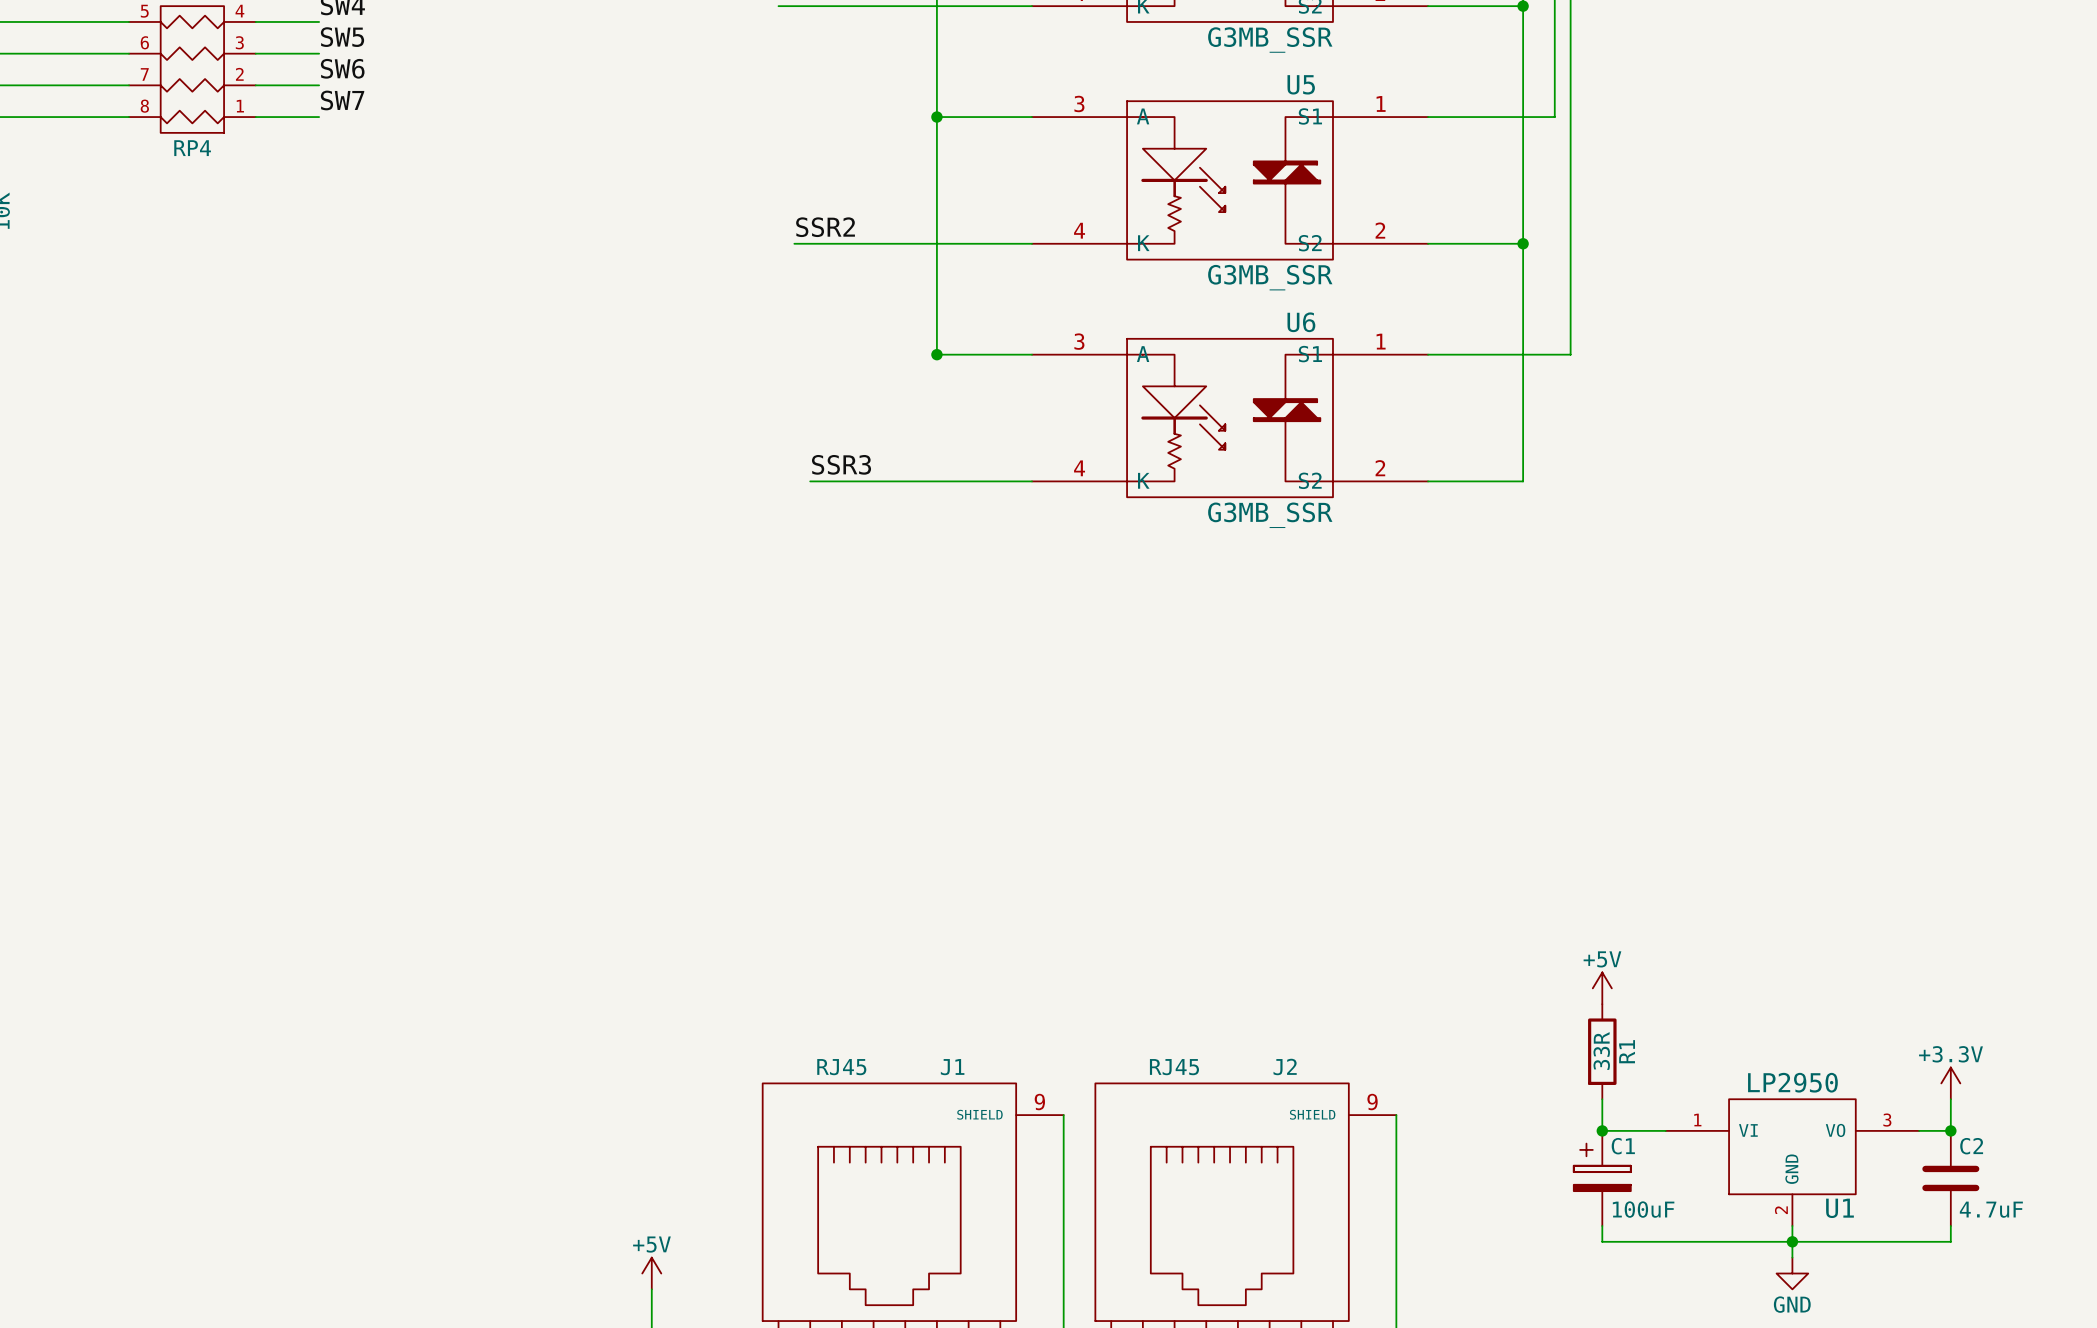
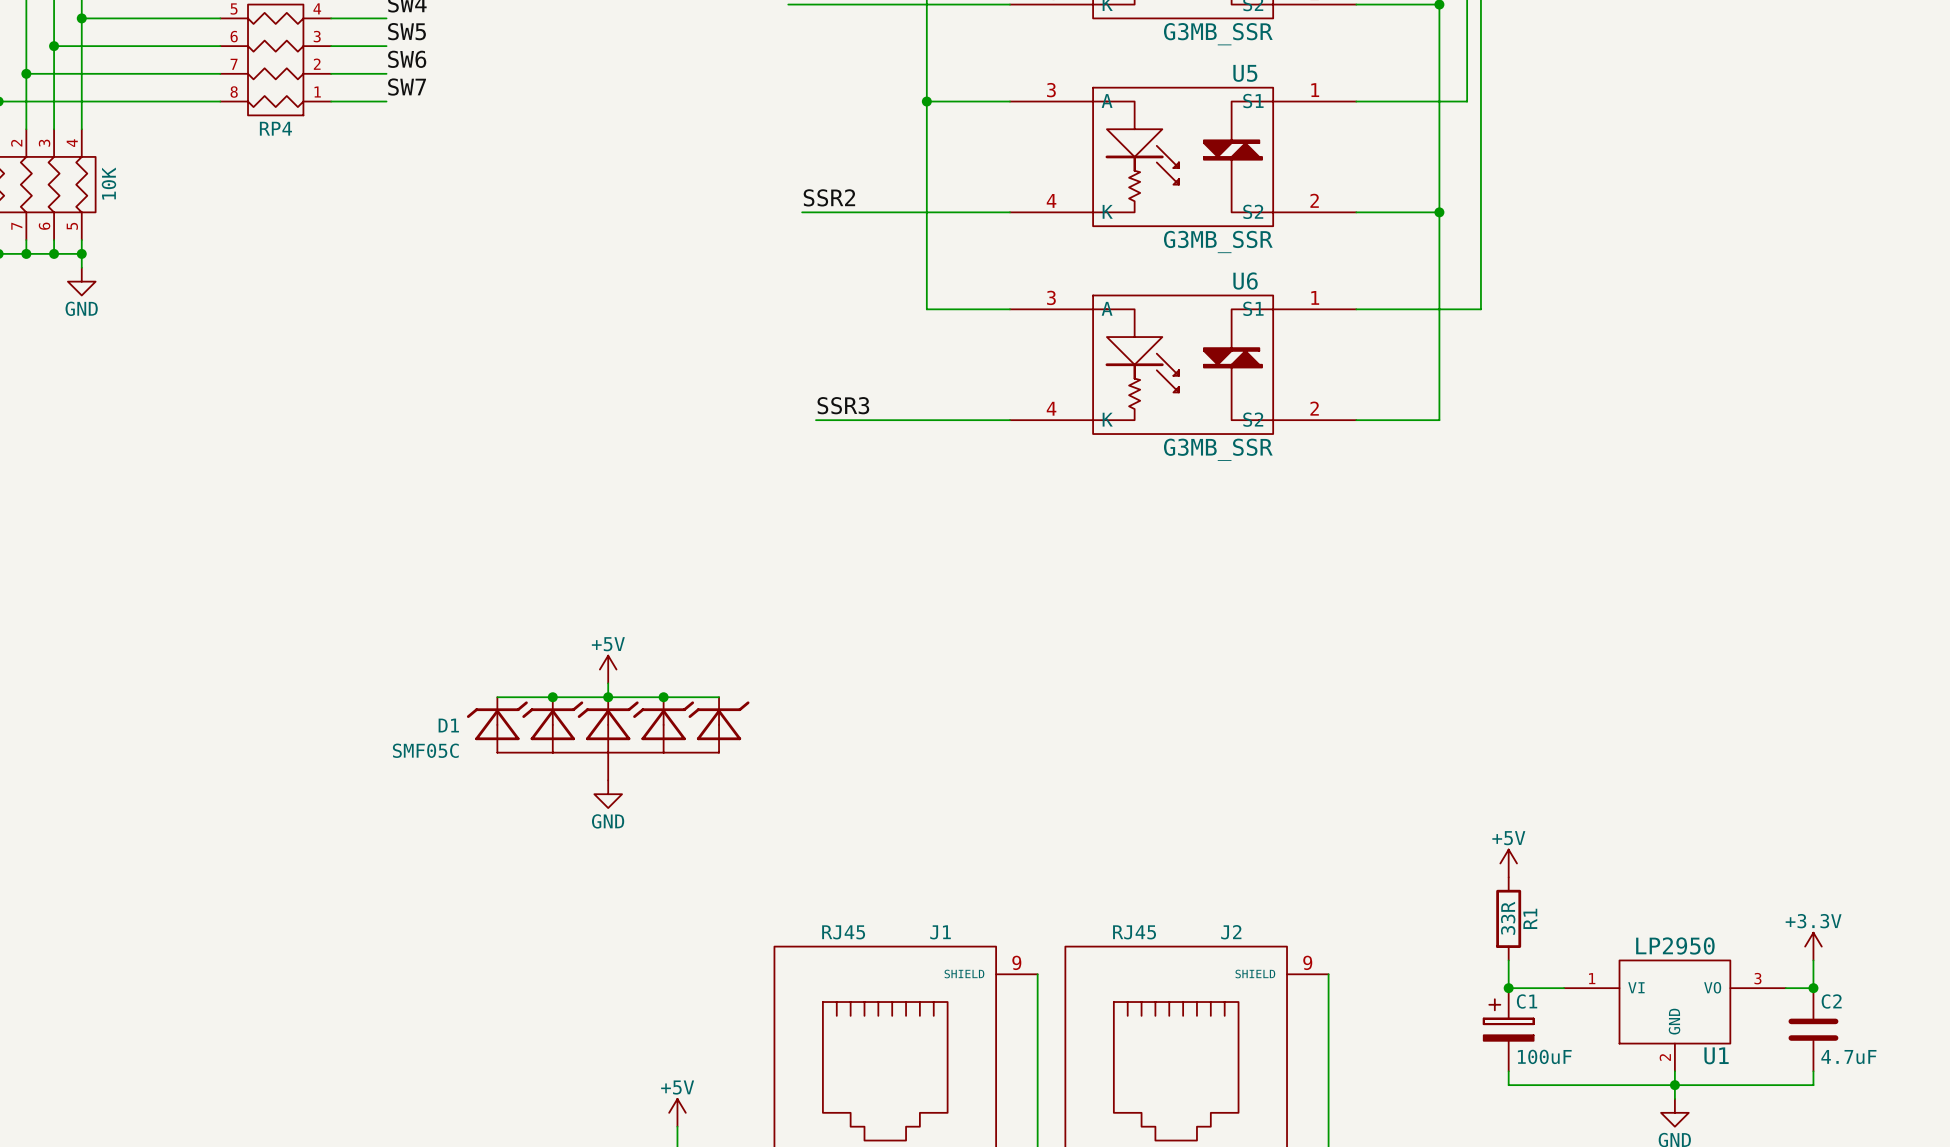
junction: (936, 354) -> none
power symbol: none -> +5V (608, 669)
wire: none -> (608, 683) (608, 697)
wire: none -> (497, 697) (719, 697)
junction: none -> (552, 697)
junction: none -> (608, 697)
junction: none -> (663, 697)
D1: none -> SMF05C (608, 738)
power symbol: none -> GND (608, 794)

